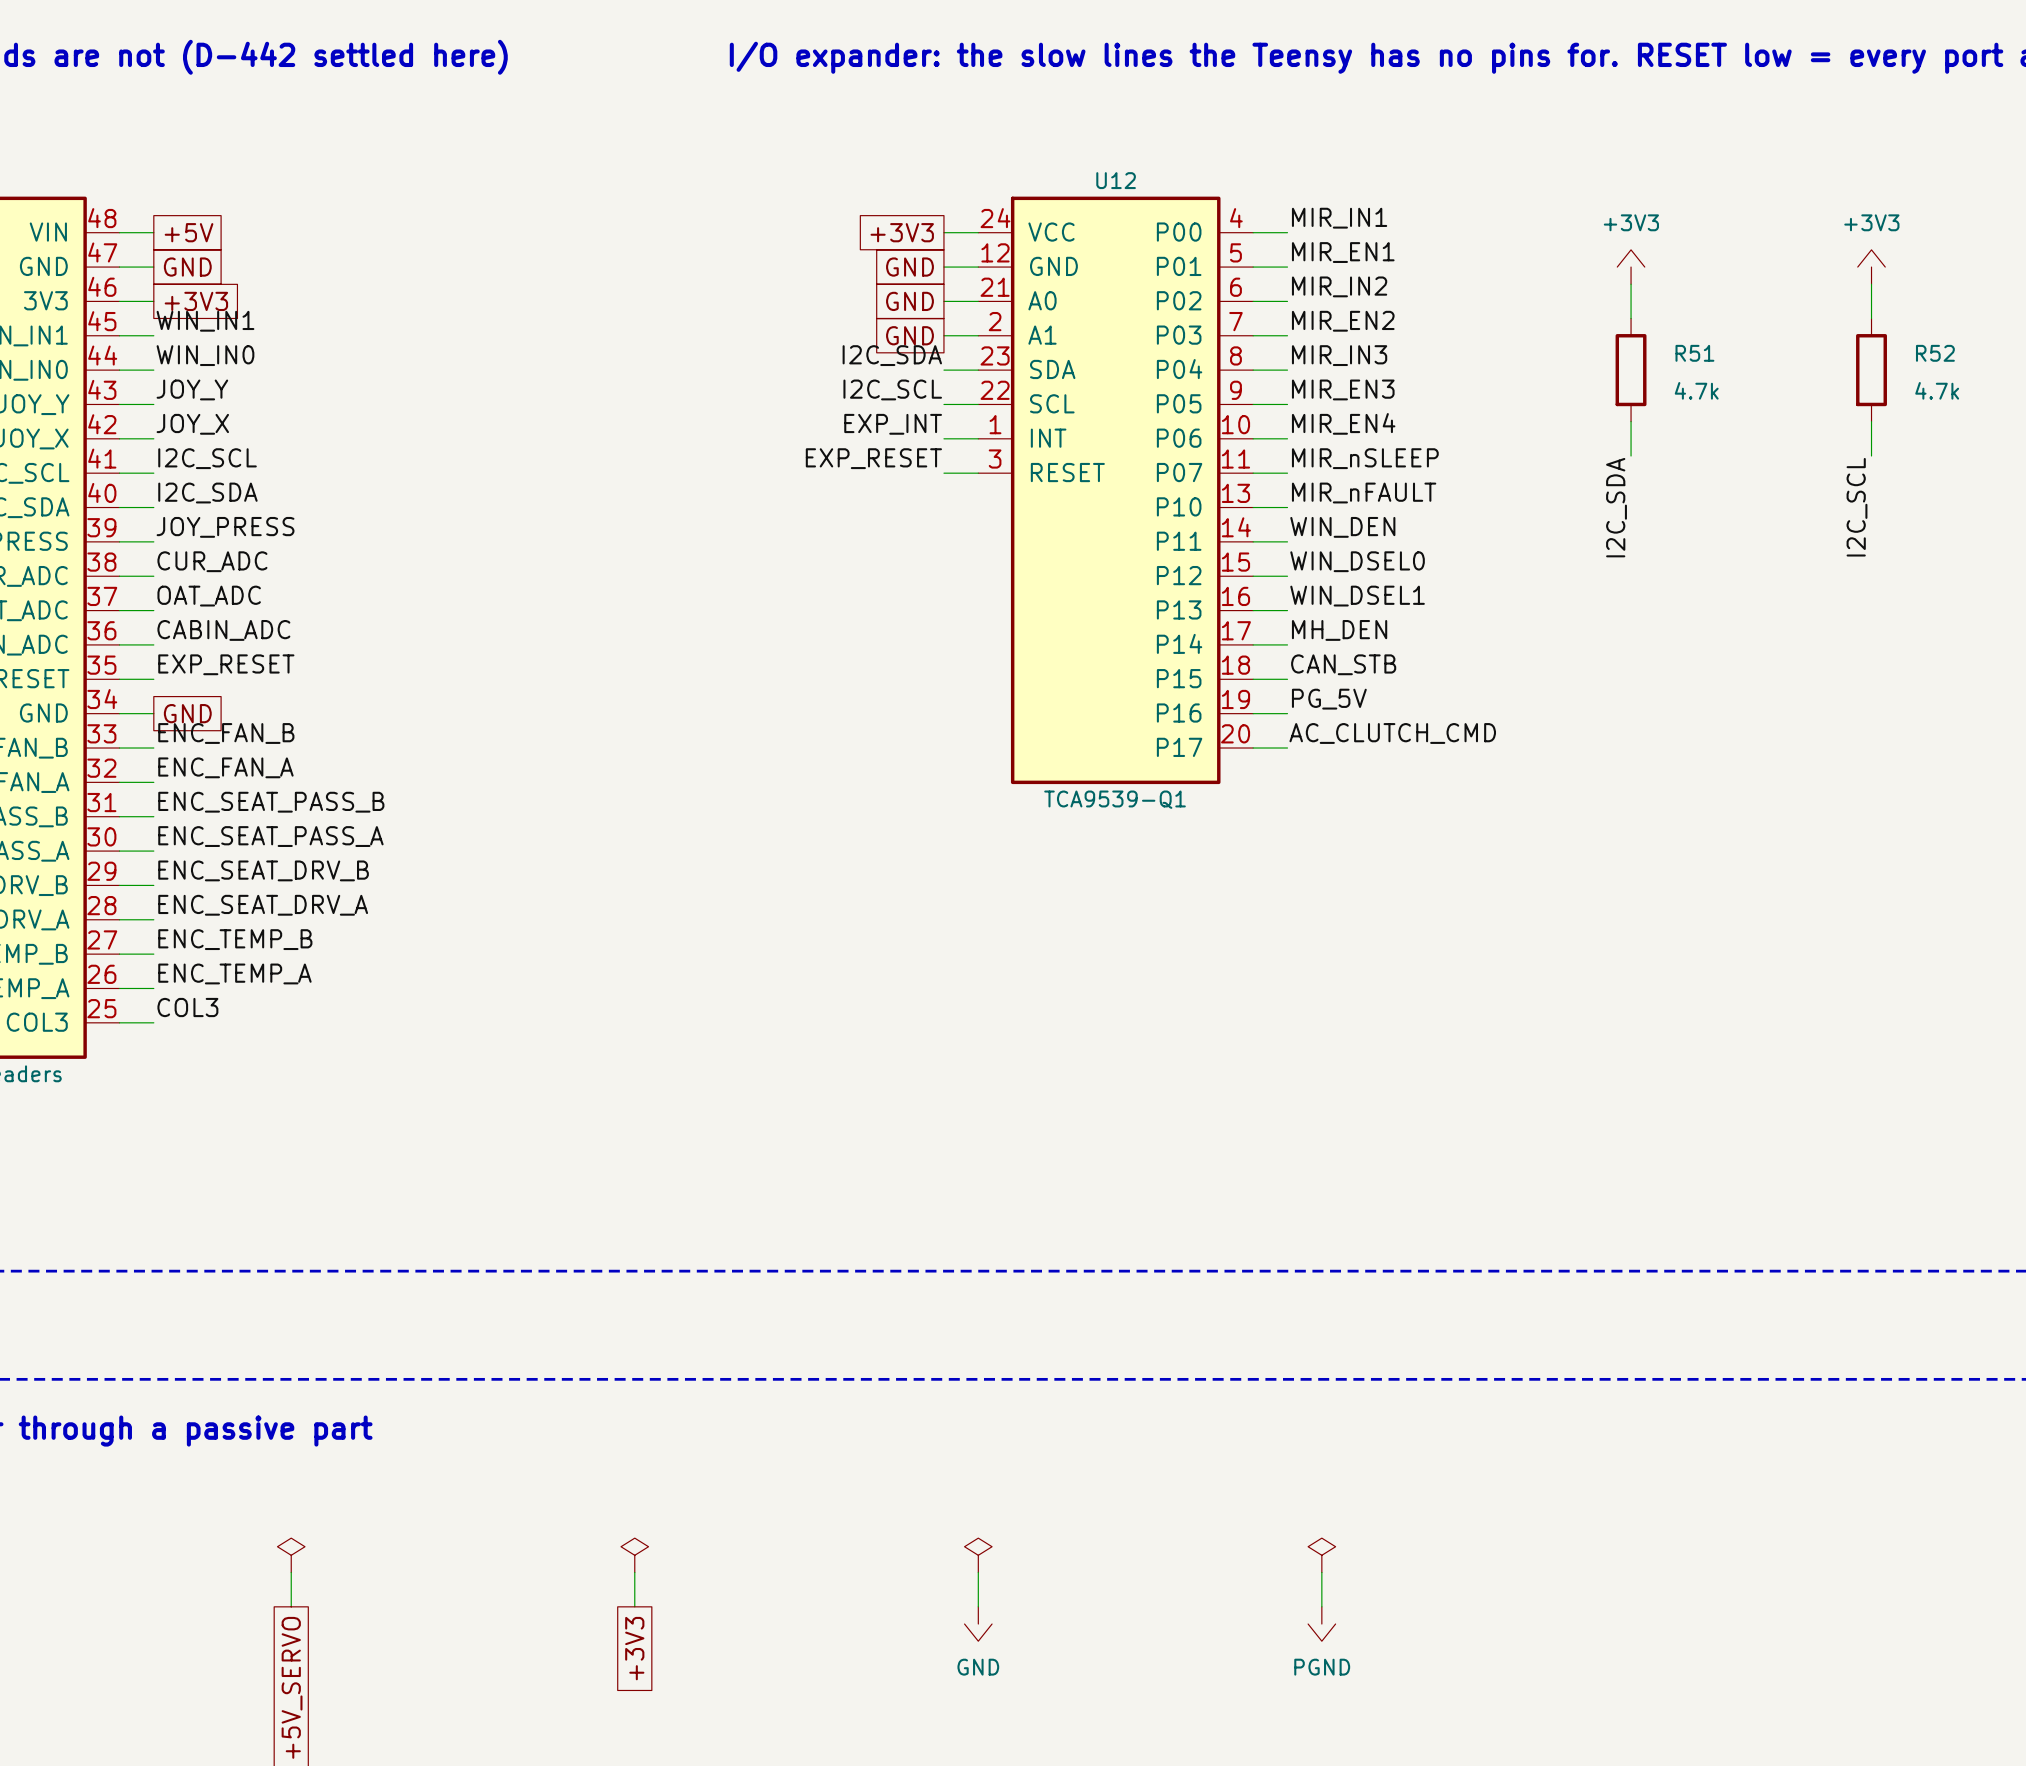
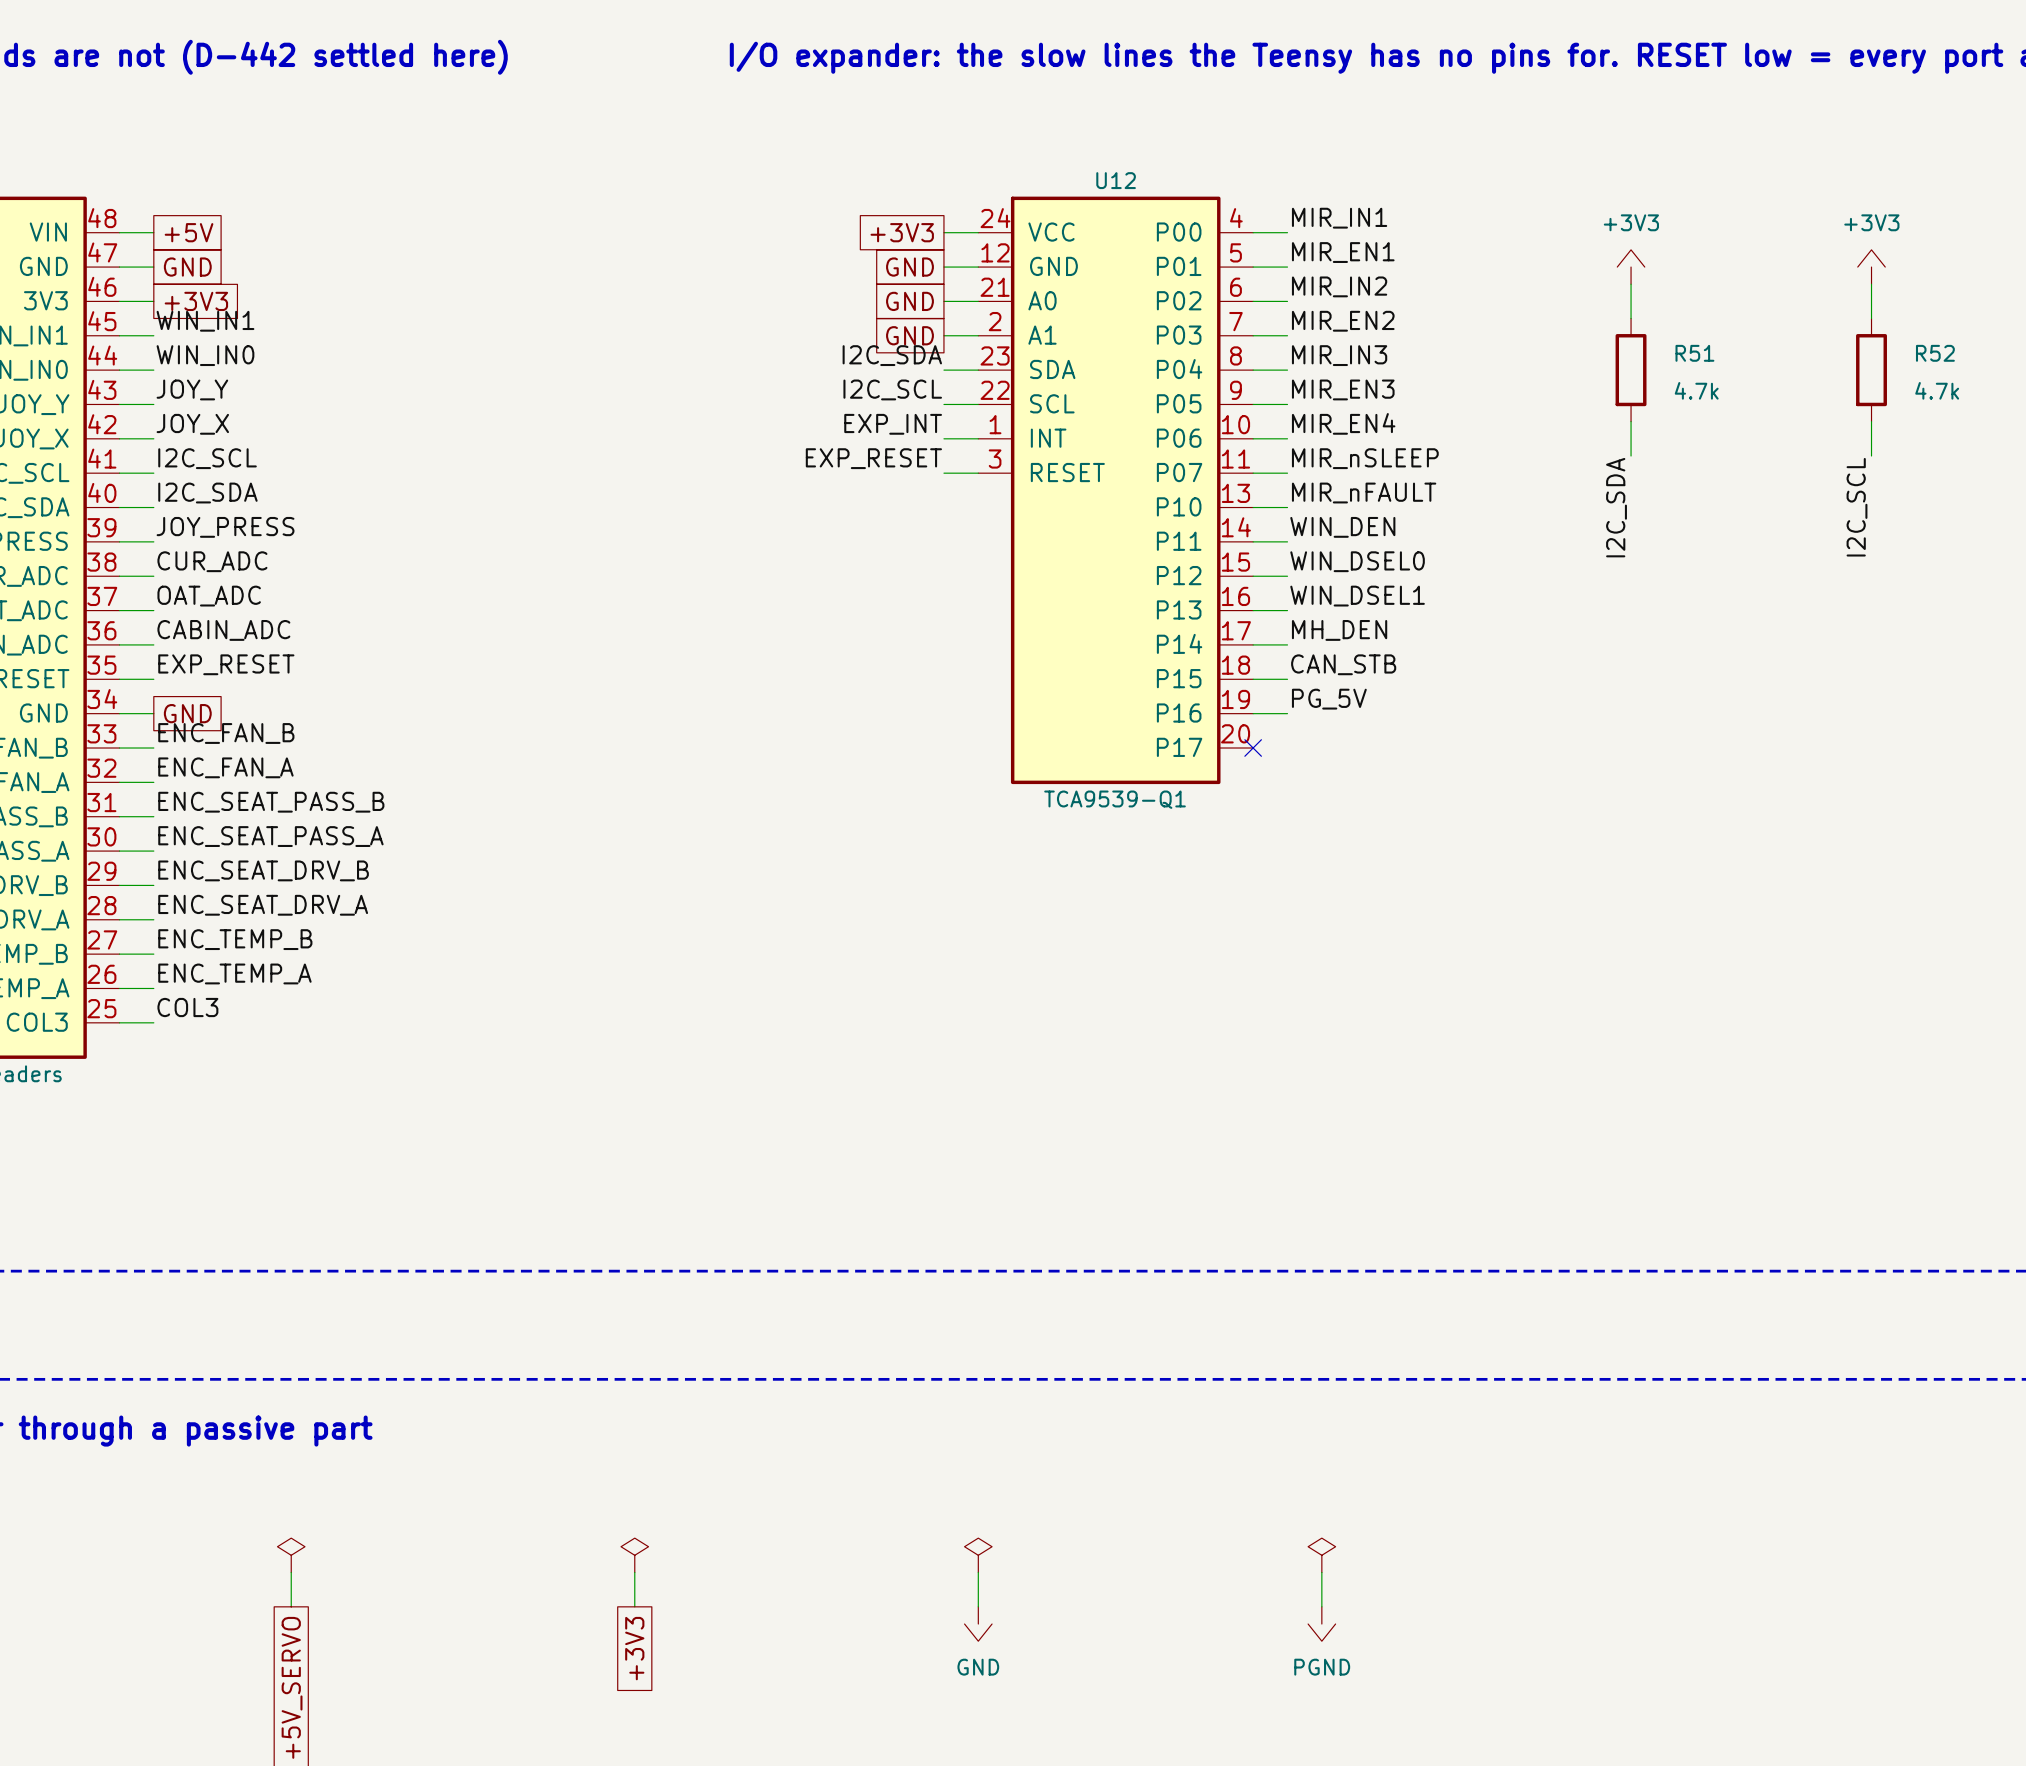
label: AC_CLUTCH_CMD (1392, 733) -> none
wire: (1253, 748) (1287, 748) -> none
no-connect mark: none -> (1253, 748)

